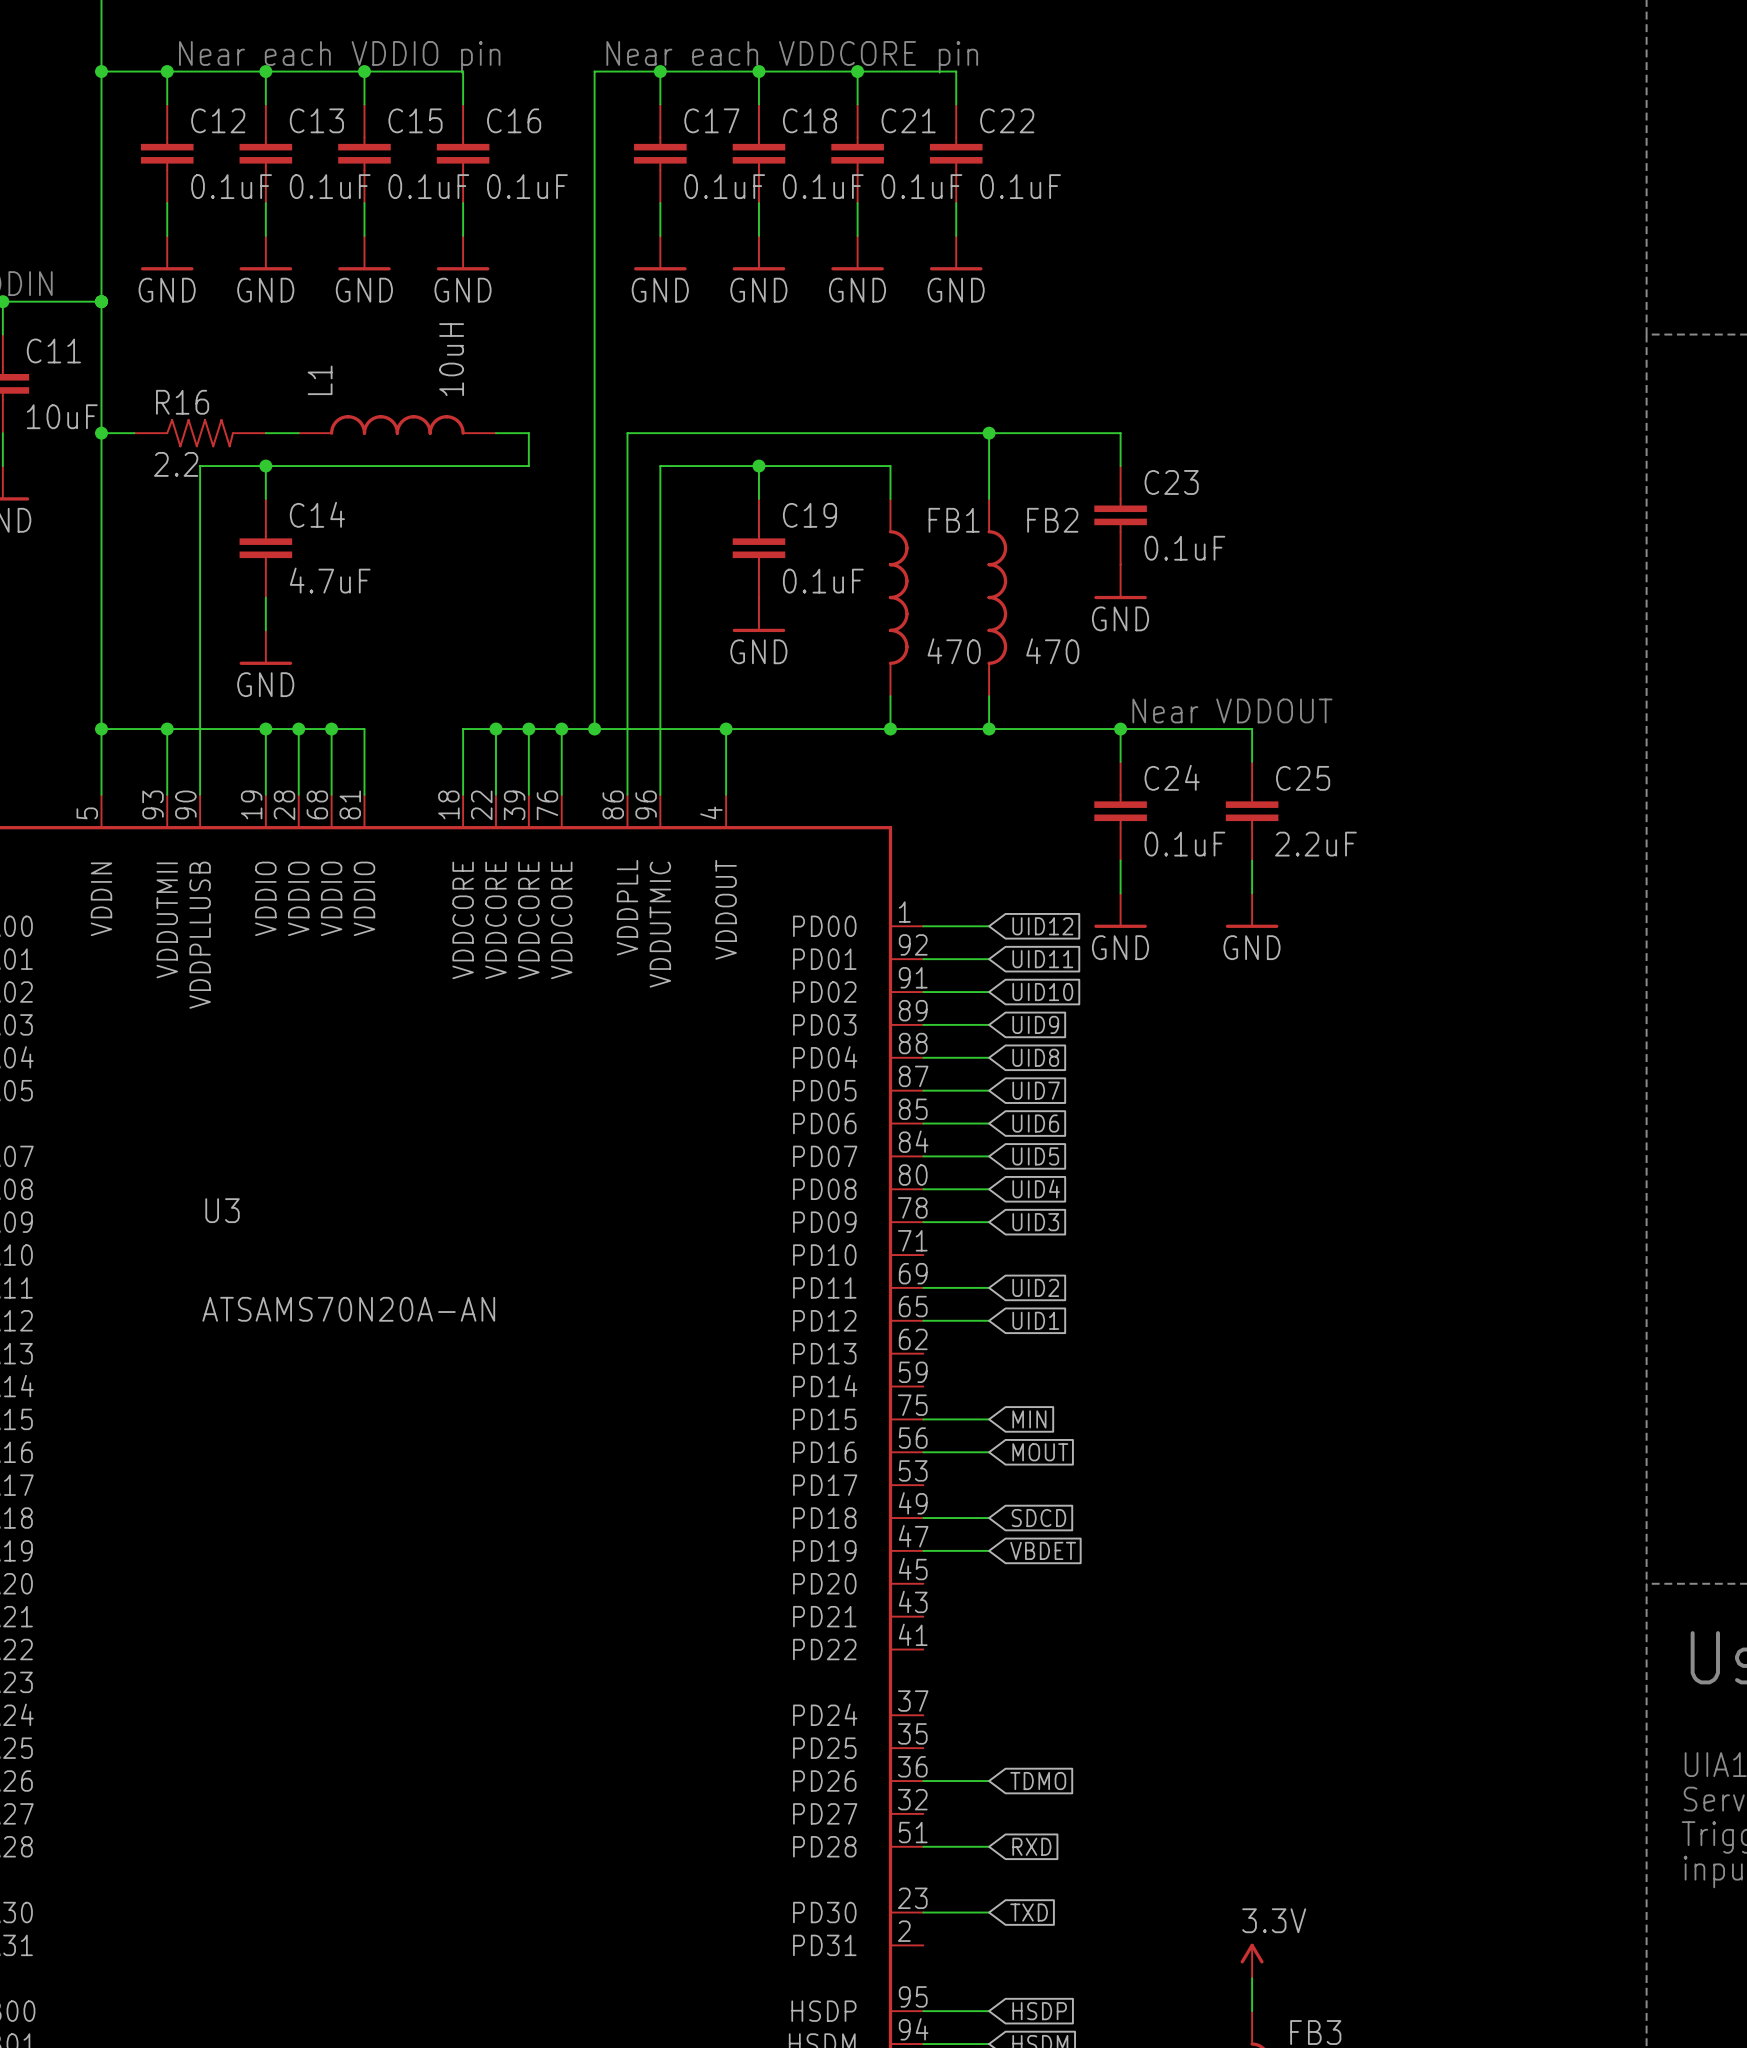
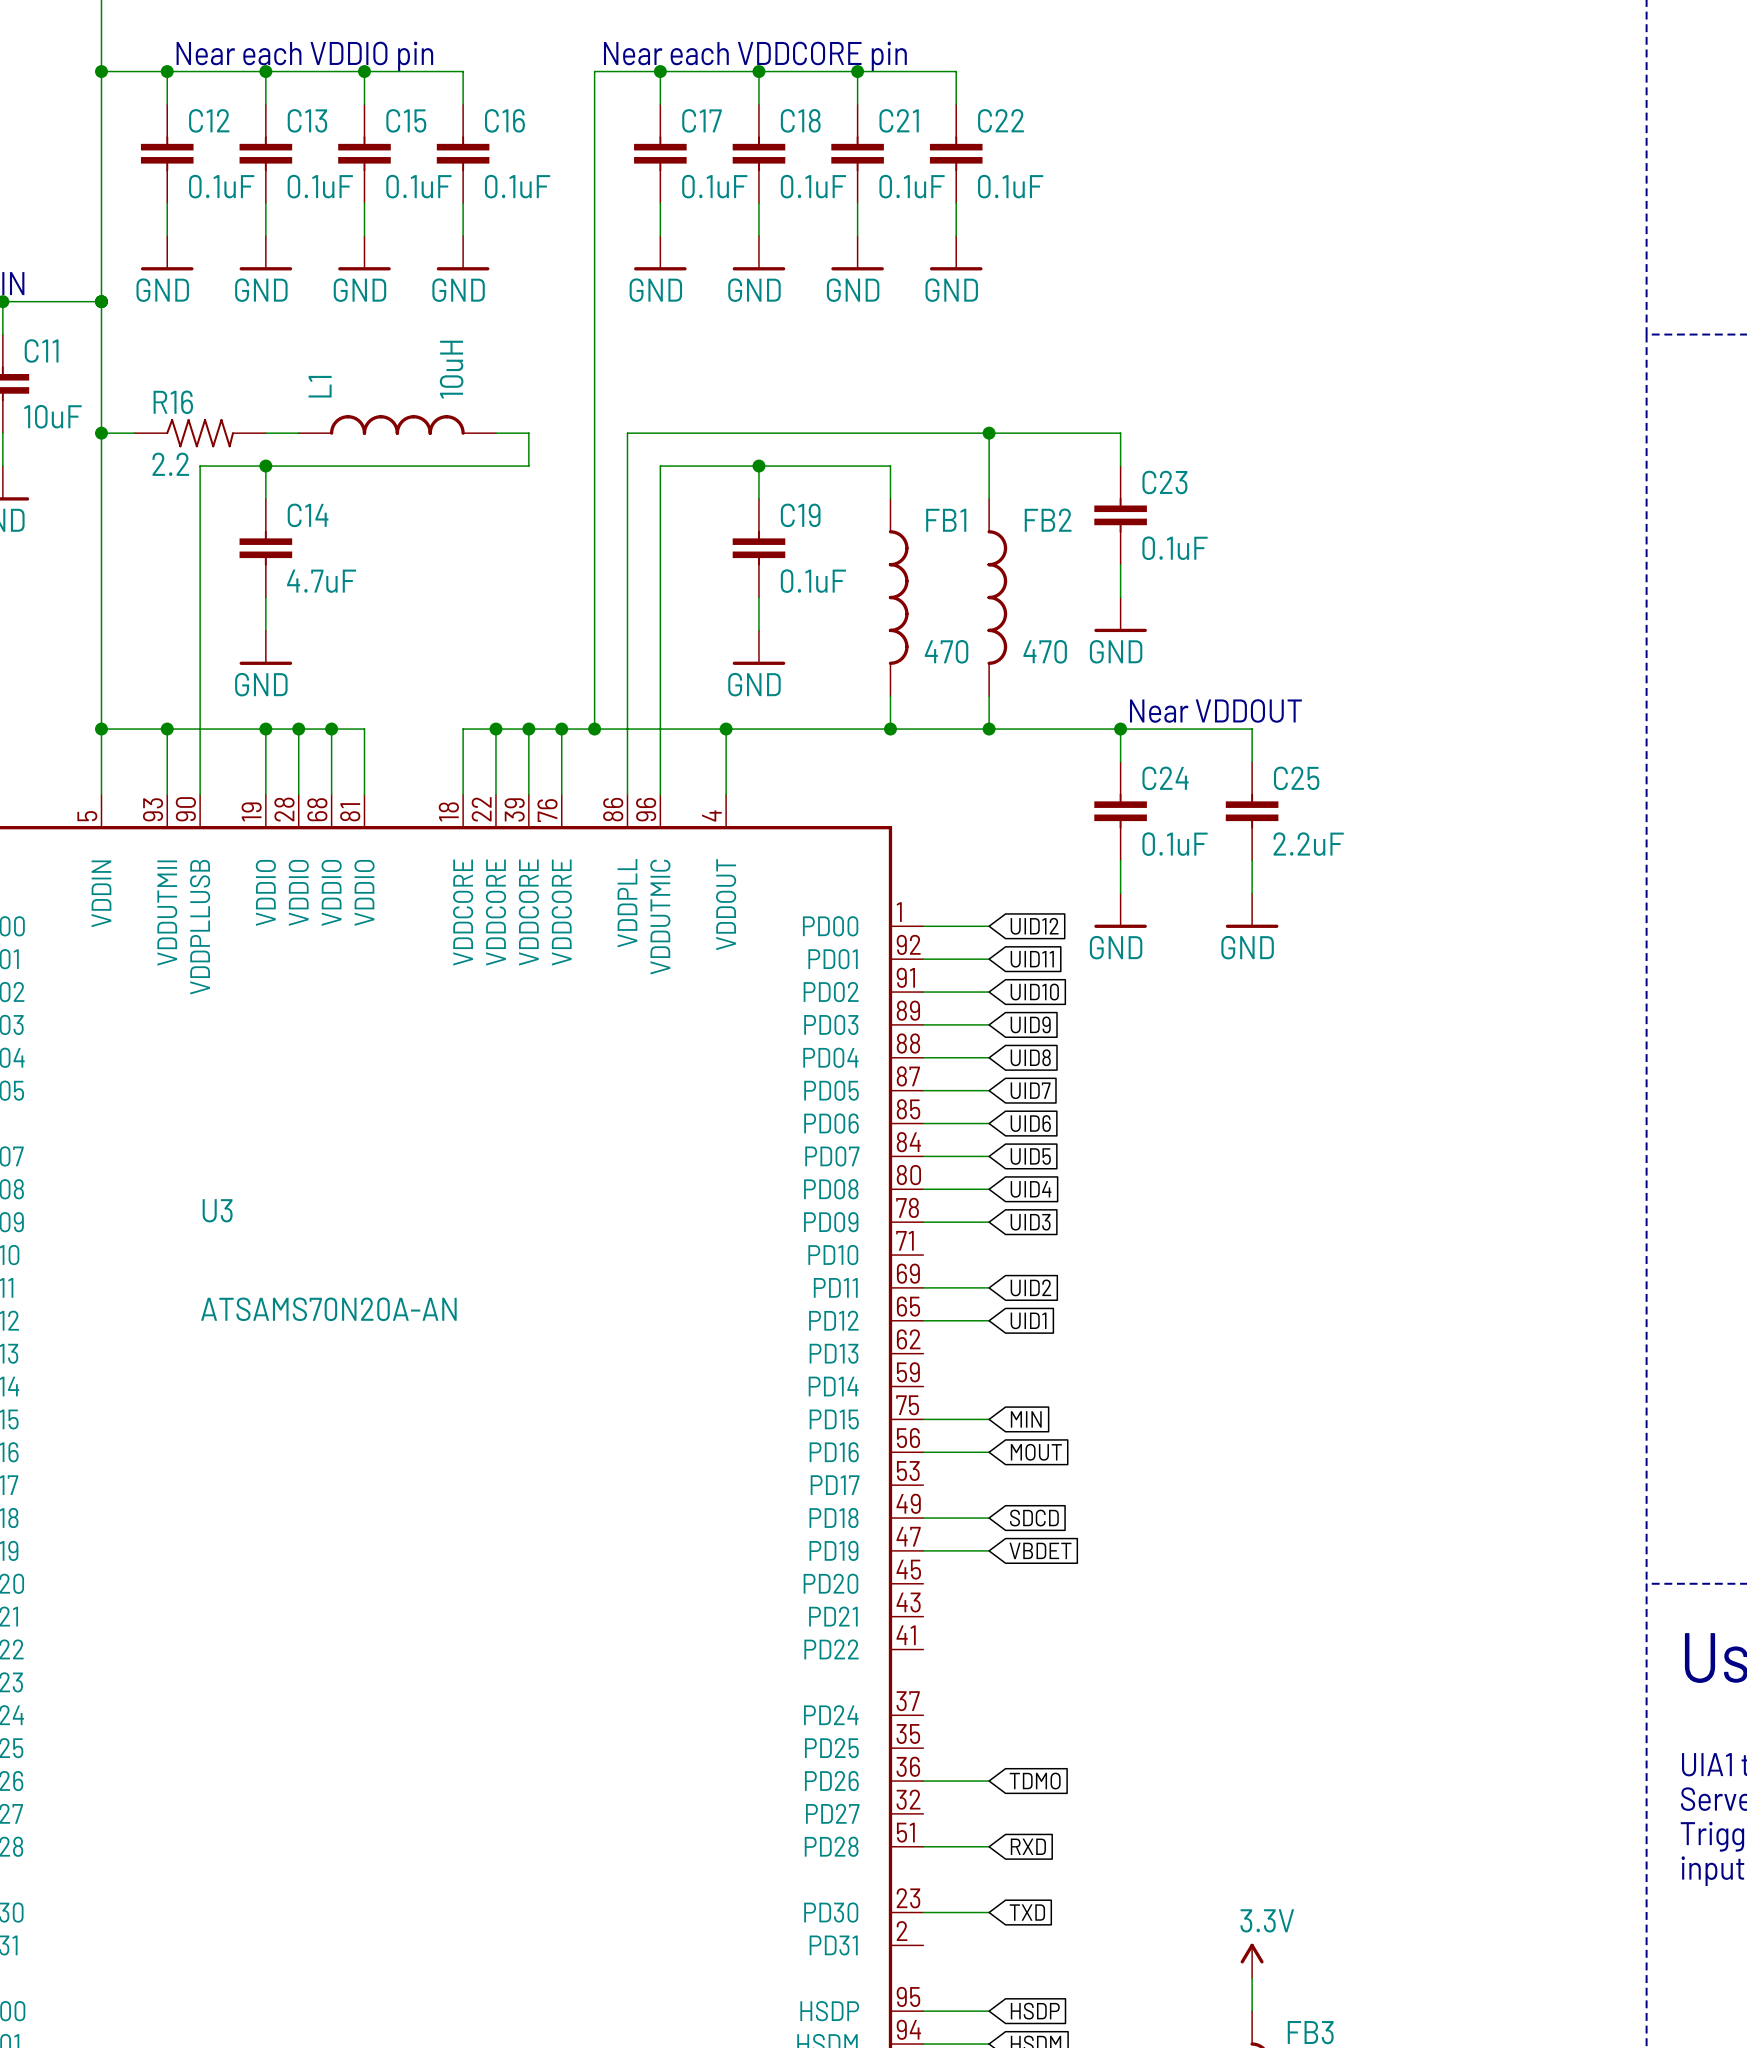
power symbol position: GND (1120, 581) -> GND (1120, 614)
power symbol position: GND (758, 614) -> GND (758, 647)

